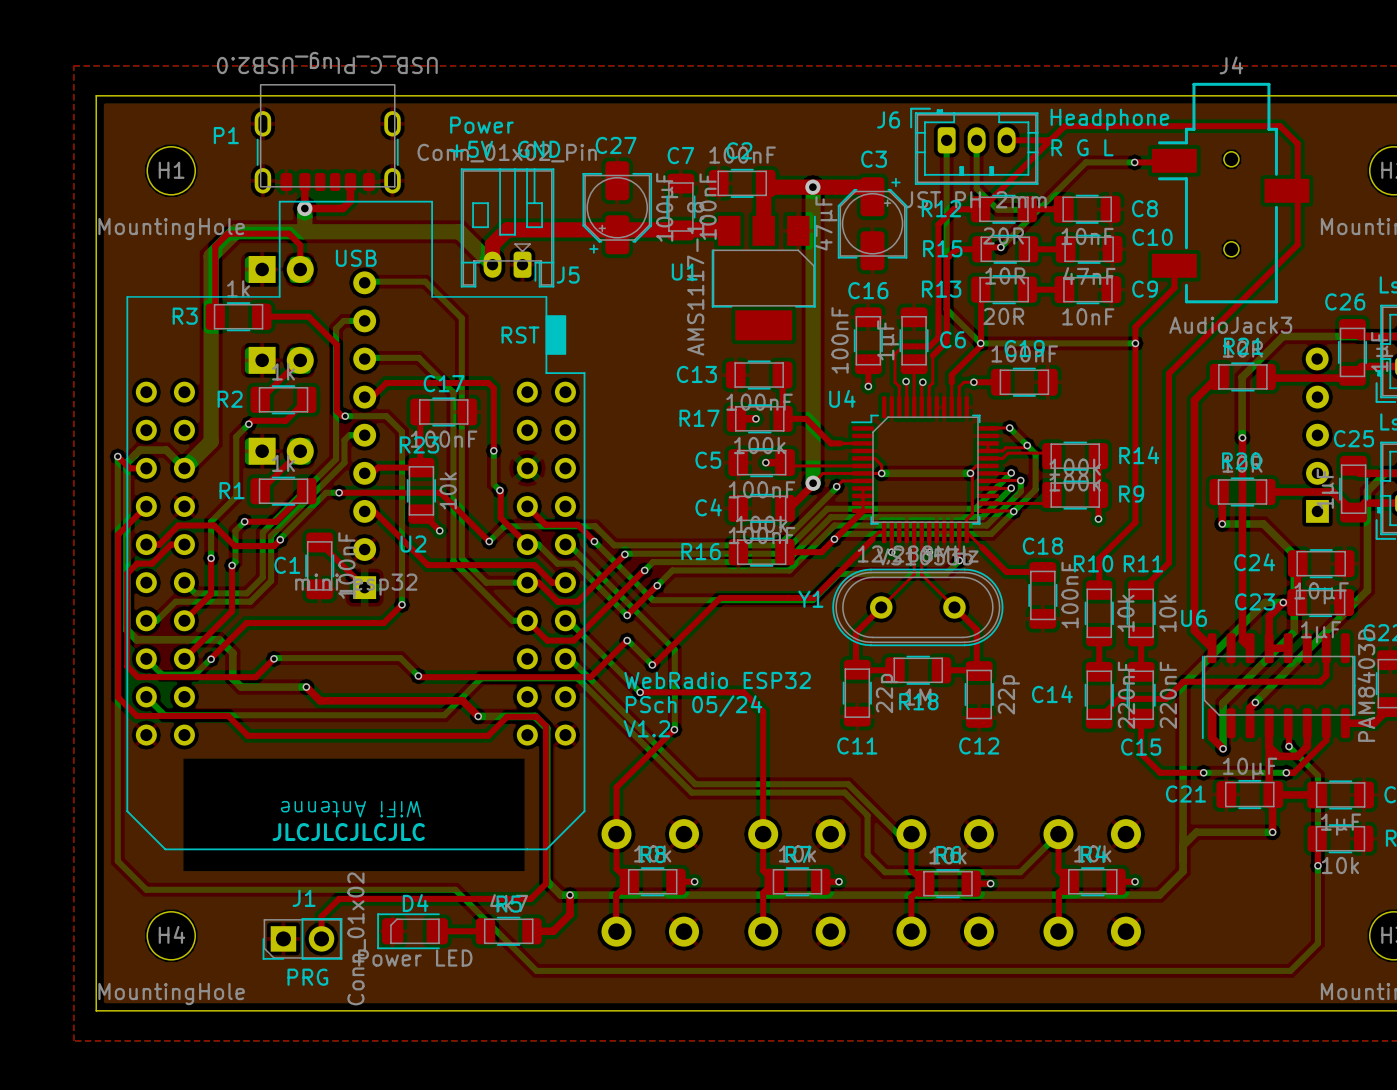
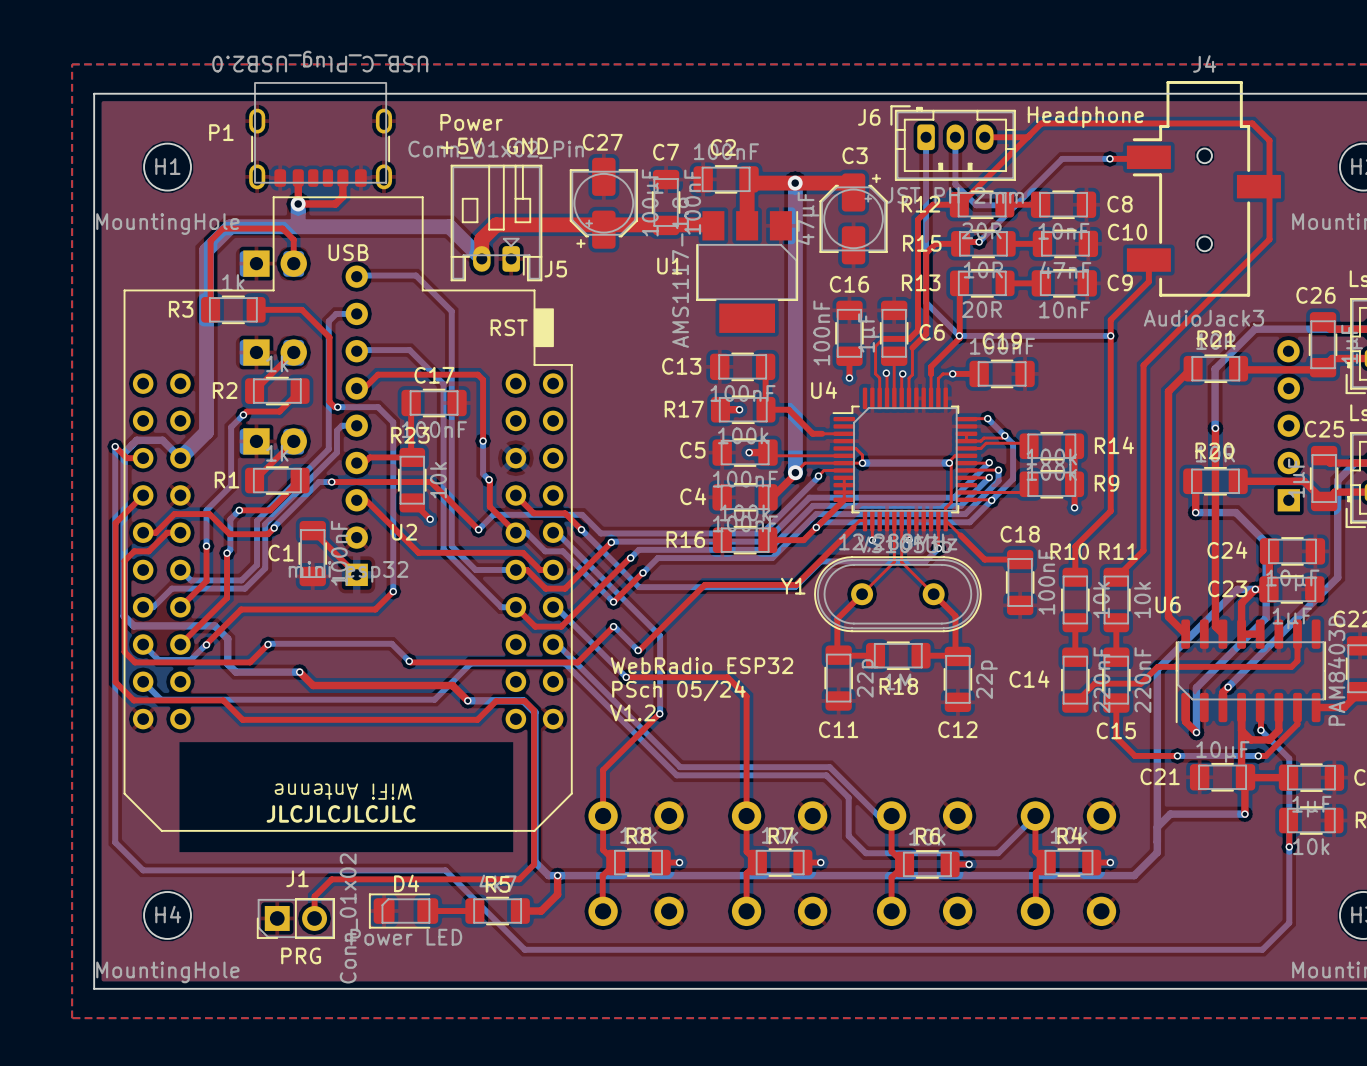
text: R G L (1082, 147) -> none

